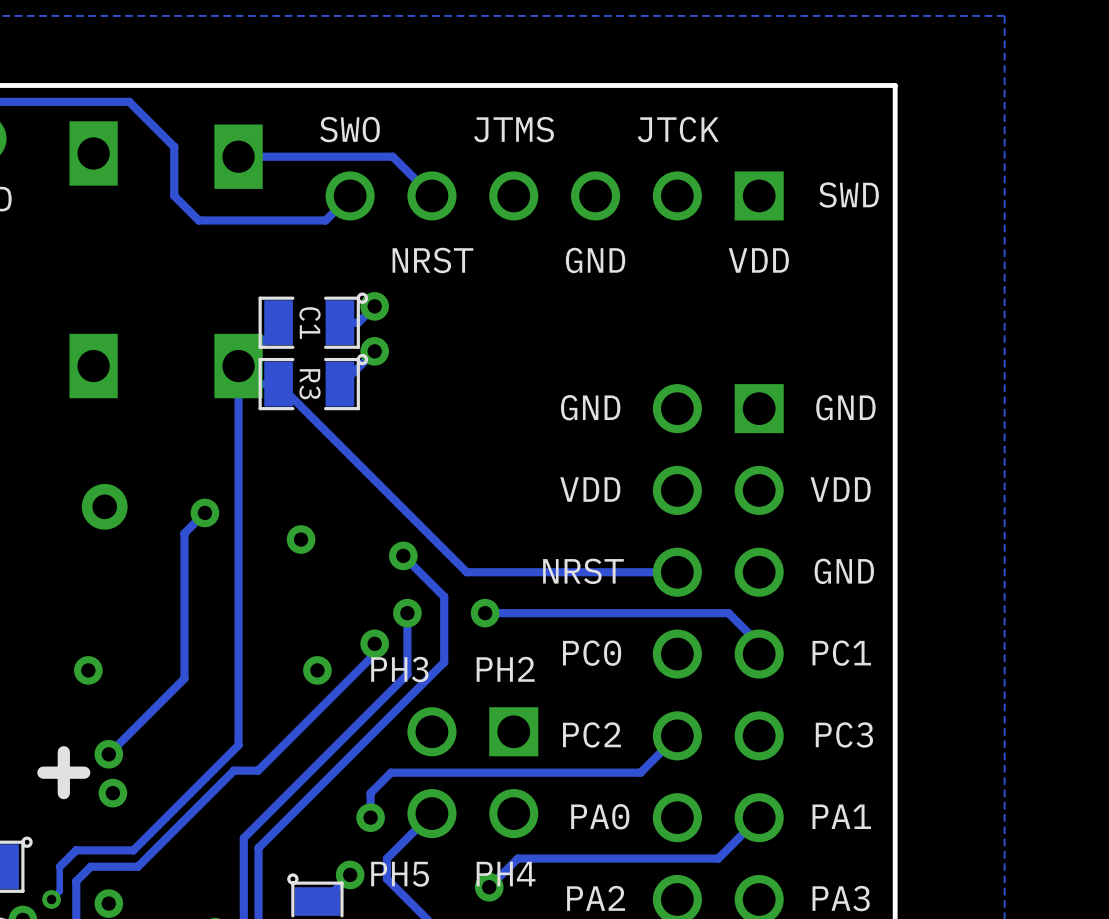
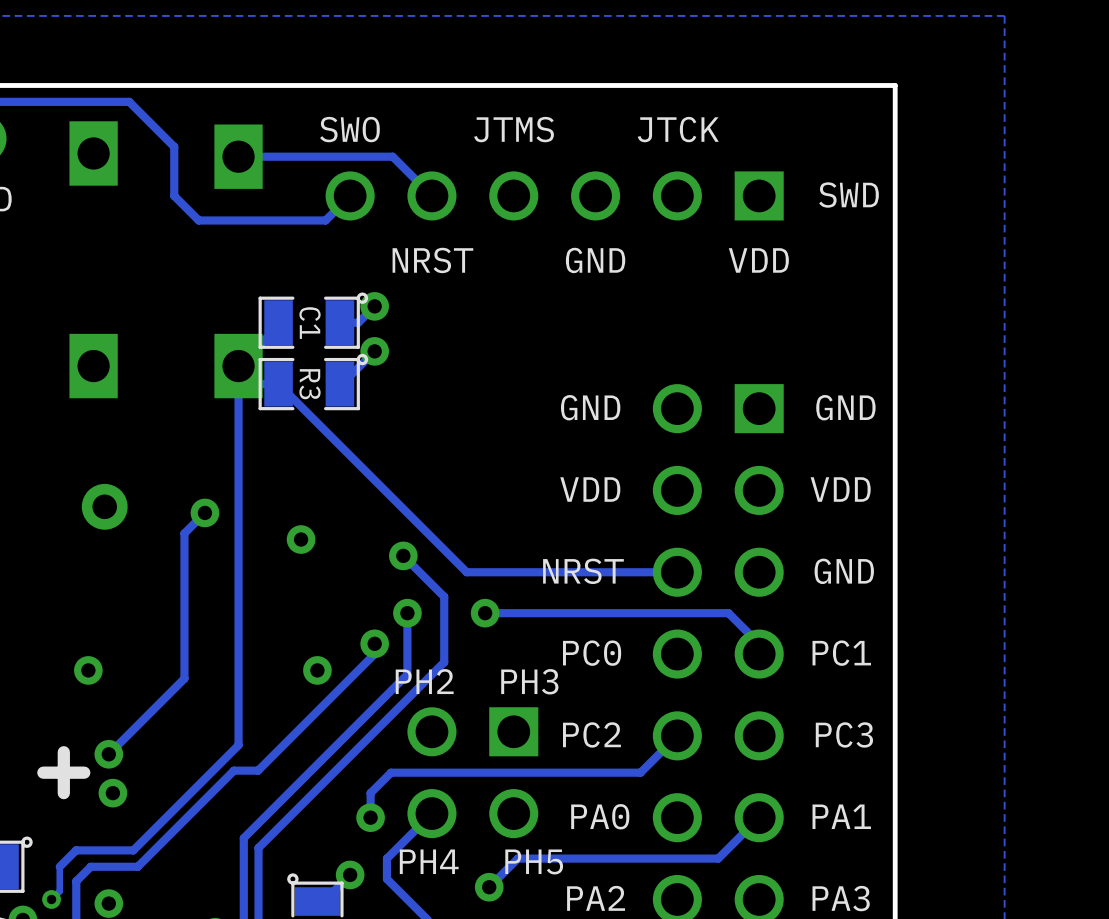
text: PH3 PH2 (452, 669) -> PH2 PH3 (477, 681)
text: PH5 PH4 (453, 874) -> PH4 PH5 (481, 861)

